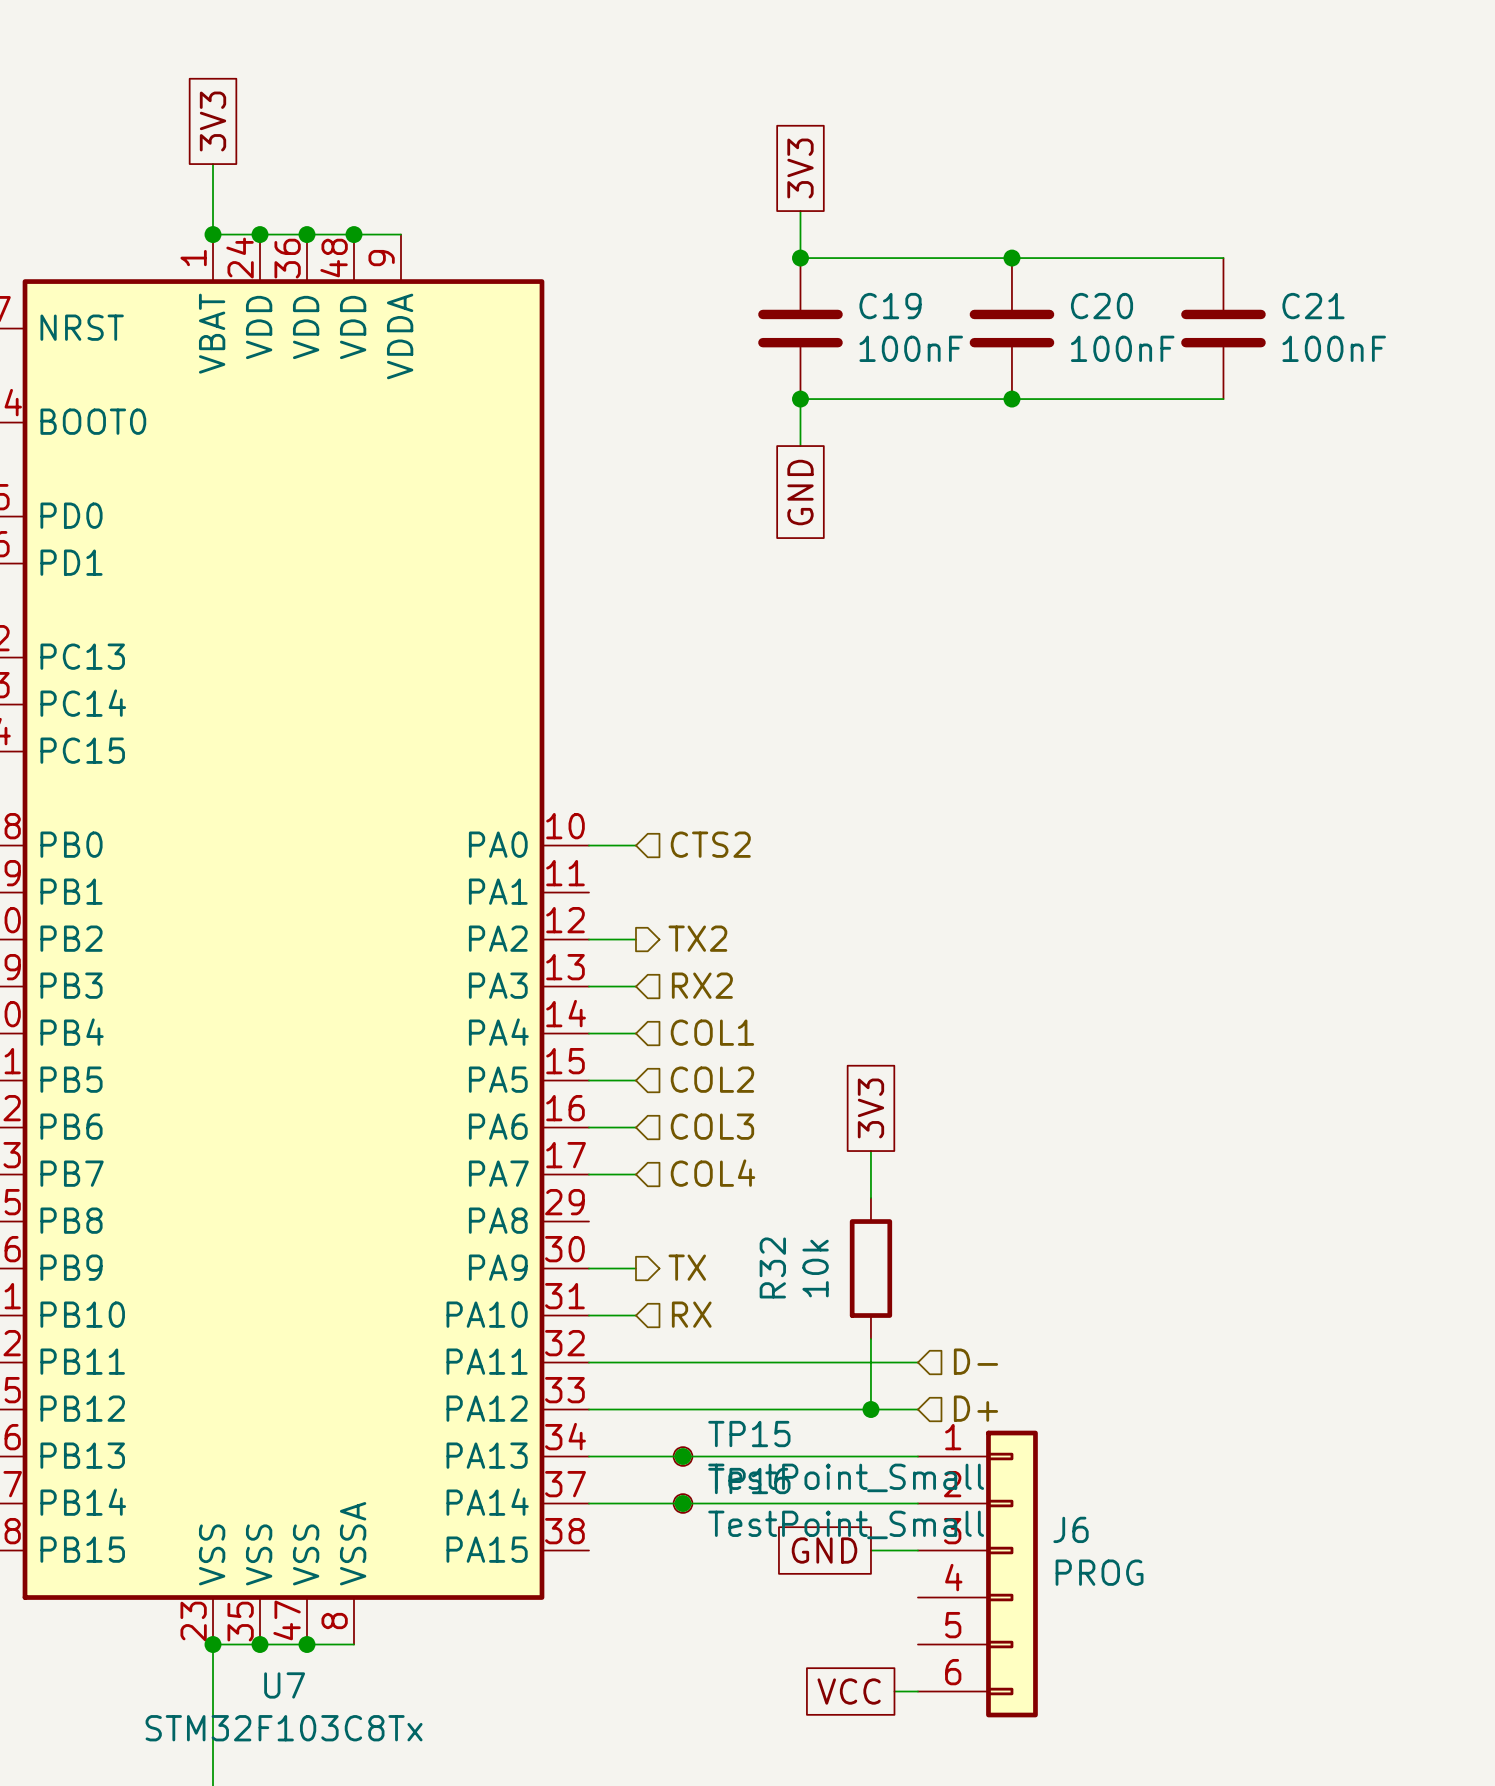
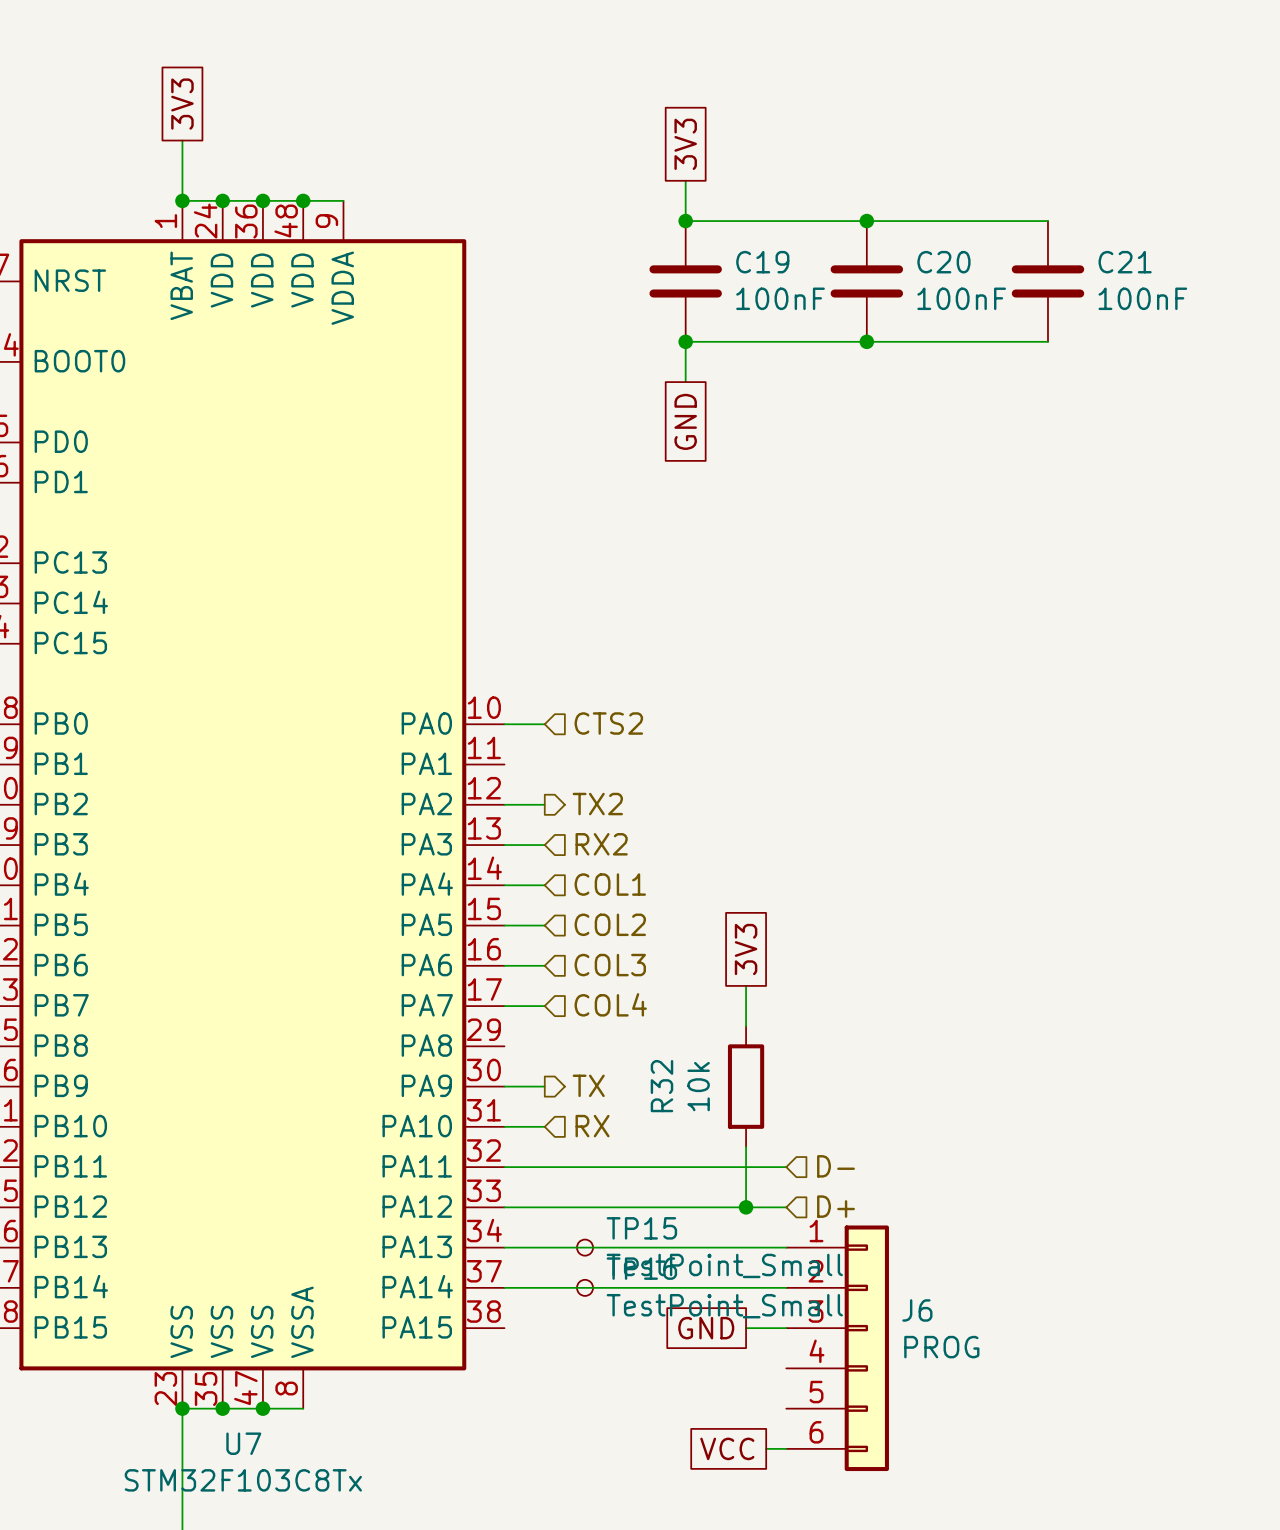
junction: (682, 1456) -> none
junction: (682, 1503) -> none

